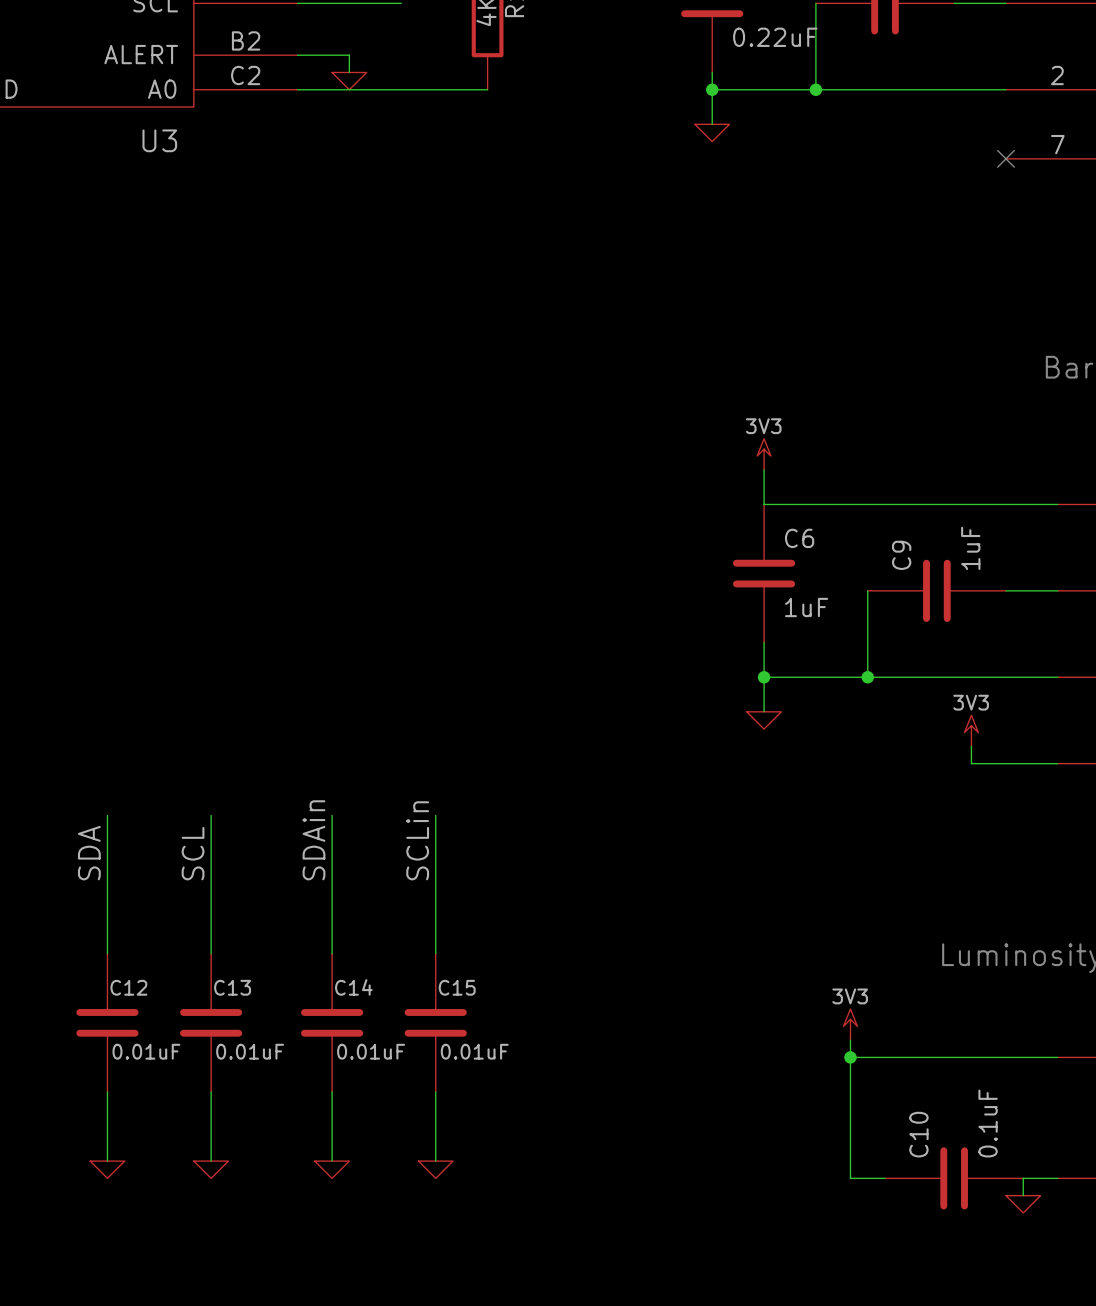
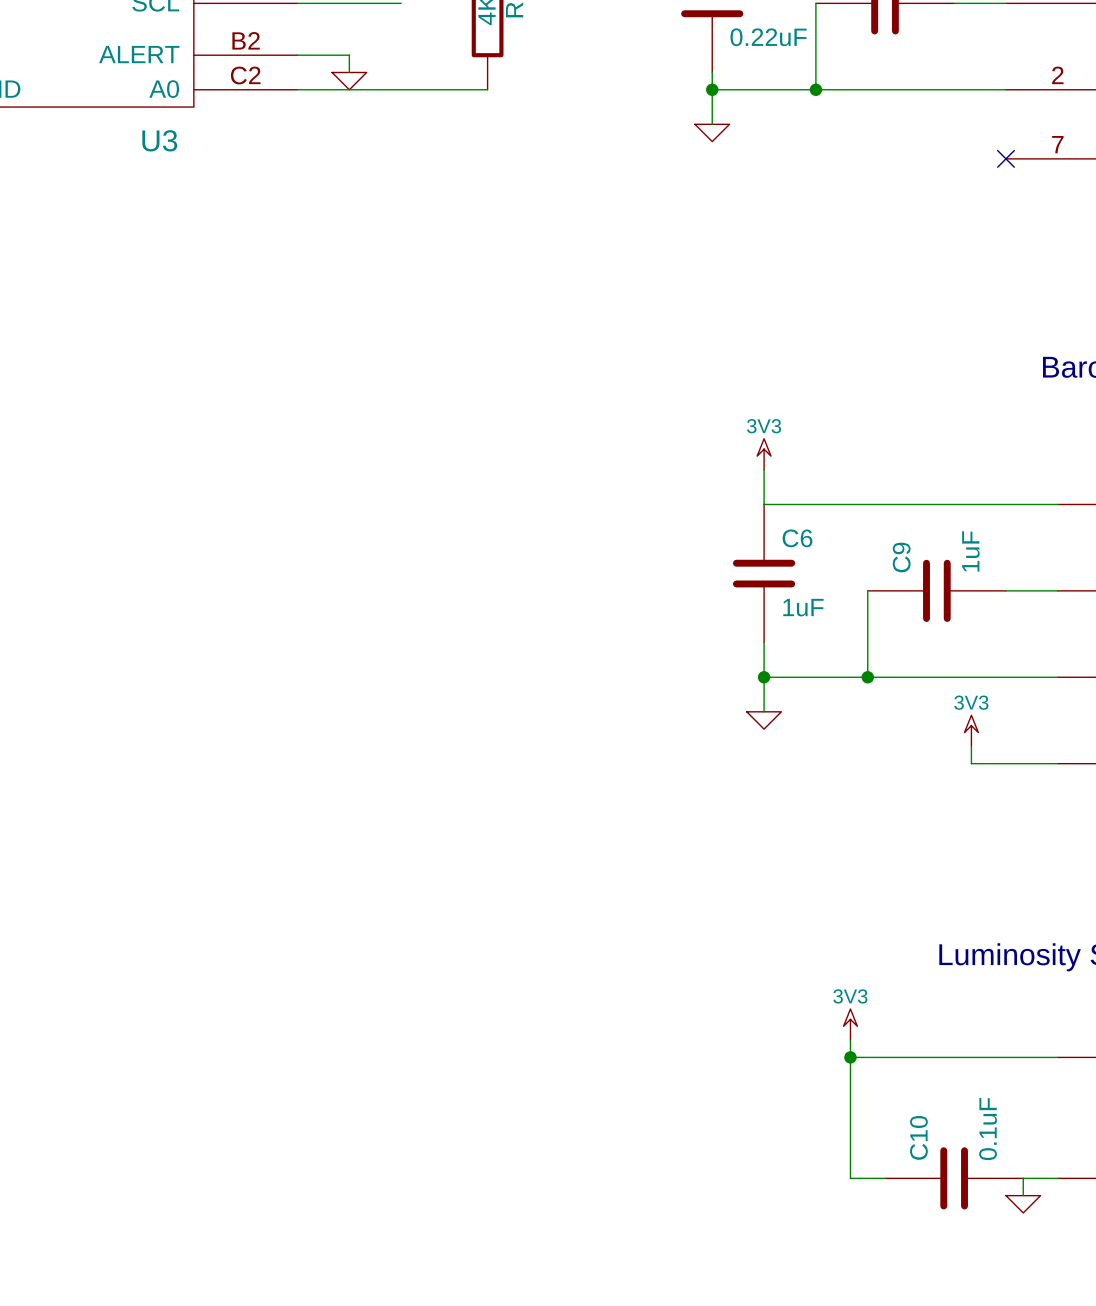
wire: (107, 815) (107, 953) -> none
wire: (211, 815) (211, 953) -> none
wire: (332, 815) (332, 953) -> none
wire: (435, 815) (435, 953) -> none
label: SDAin (313, 840) -> none
label: SCLin (417, 840) -> none
label: SDA (89, 853) -> none
label: SCL (193, 853) -> none
C12: 0.01uF (107, 1022) -> none
C13: 0.01uF (211, 1022) -> none
C14: 0.01uF (332, 1022) -> none
C15: 0.01uF (435, 1022) -> none
wire: (107, 1091) (107, 1161) -> none
wire: (211, 1091) (211, 1161) -> none
wire: (332, 1091) (332, 1161) -> none
wire: (435, 1091) (435, 1161) -> none
power symbol: (107, 1169) -> none
power symbol: (211, 1169) -> none
power symbol: (332, 1169) -> none
power symbol: (435, 1169) -> none

